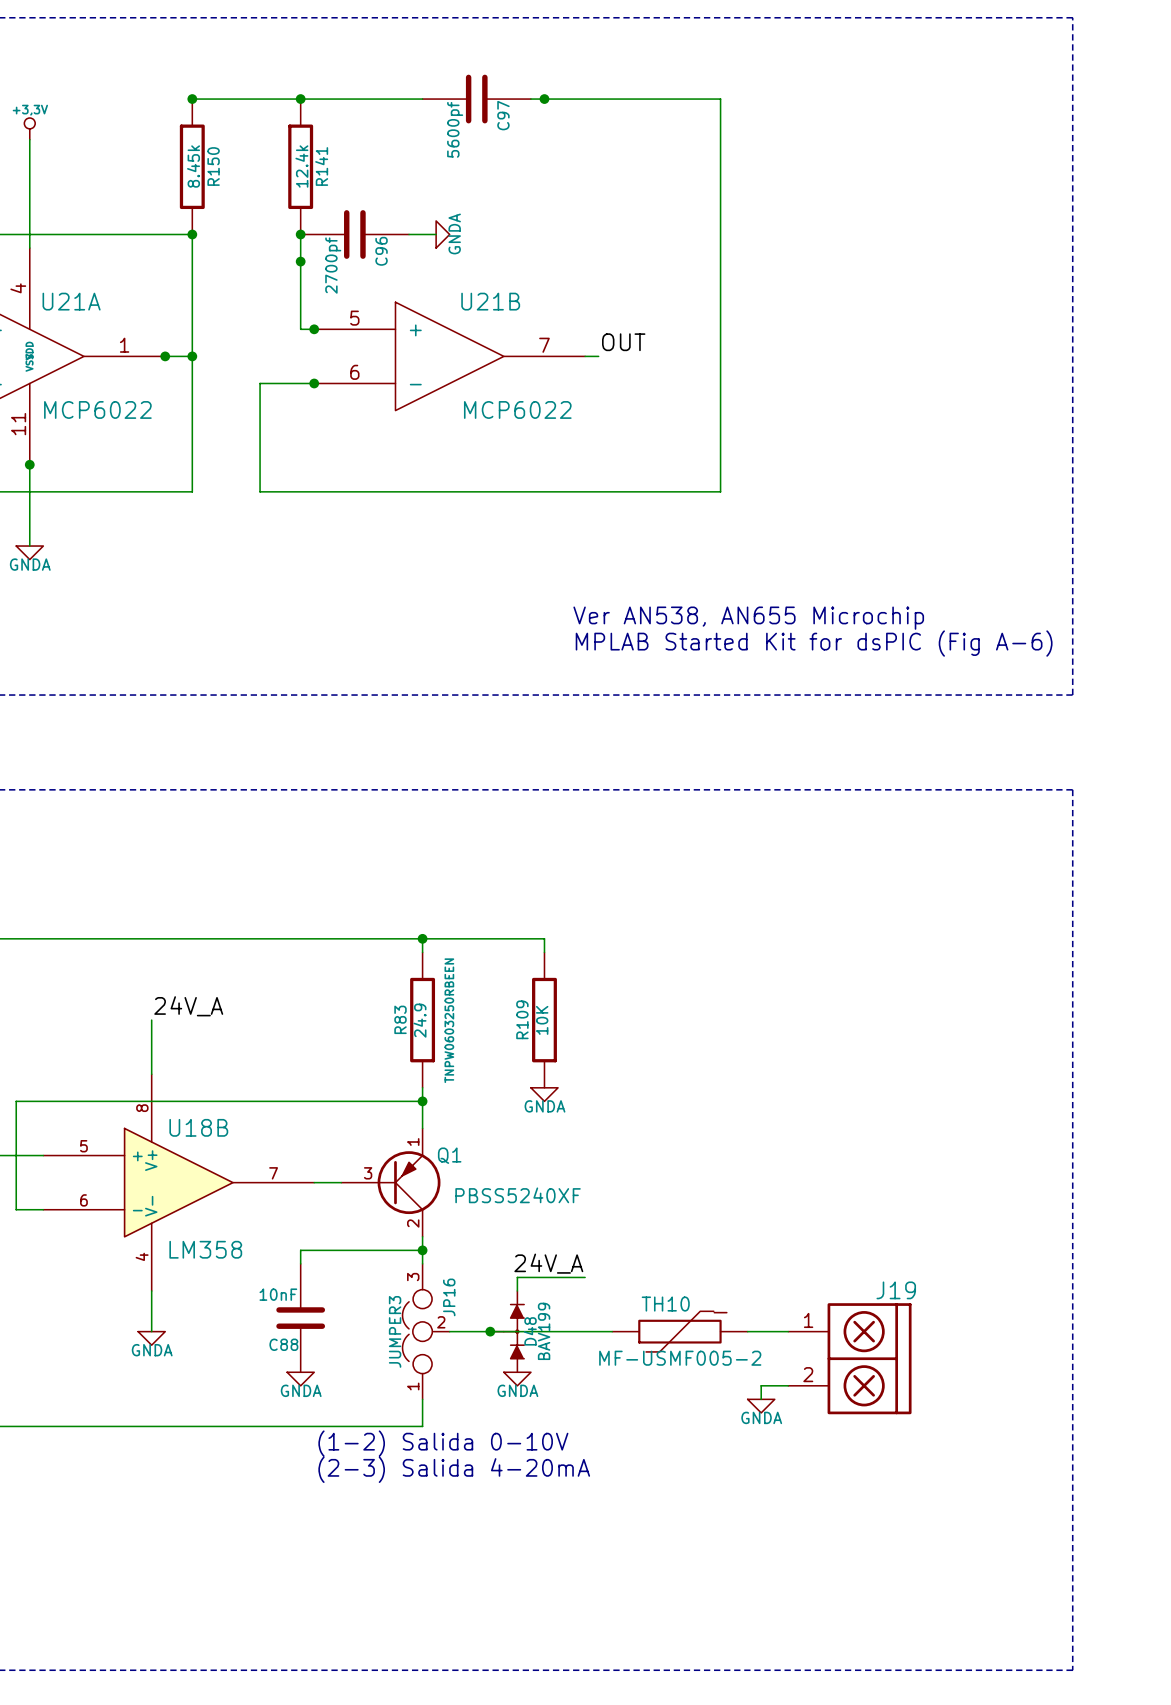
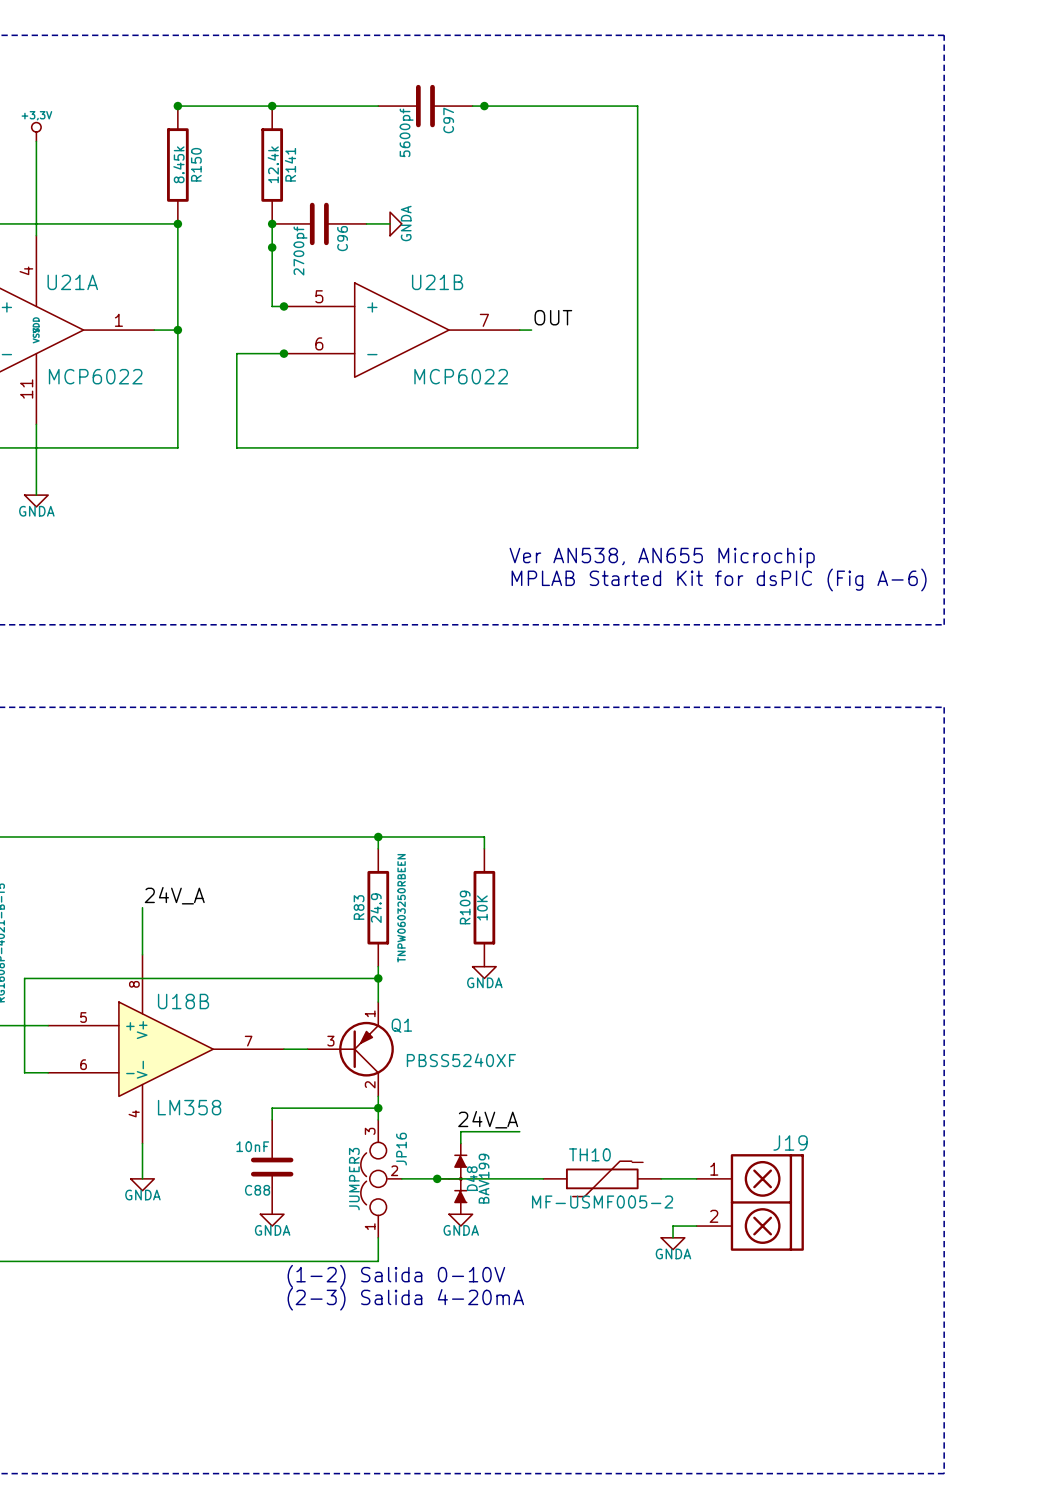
junction: (165, 356) -> none
junction: (29, 464) -> none

